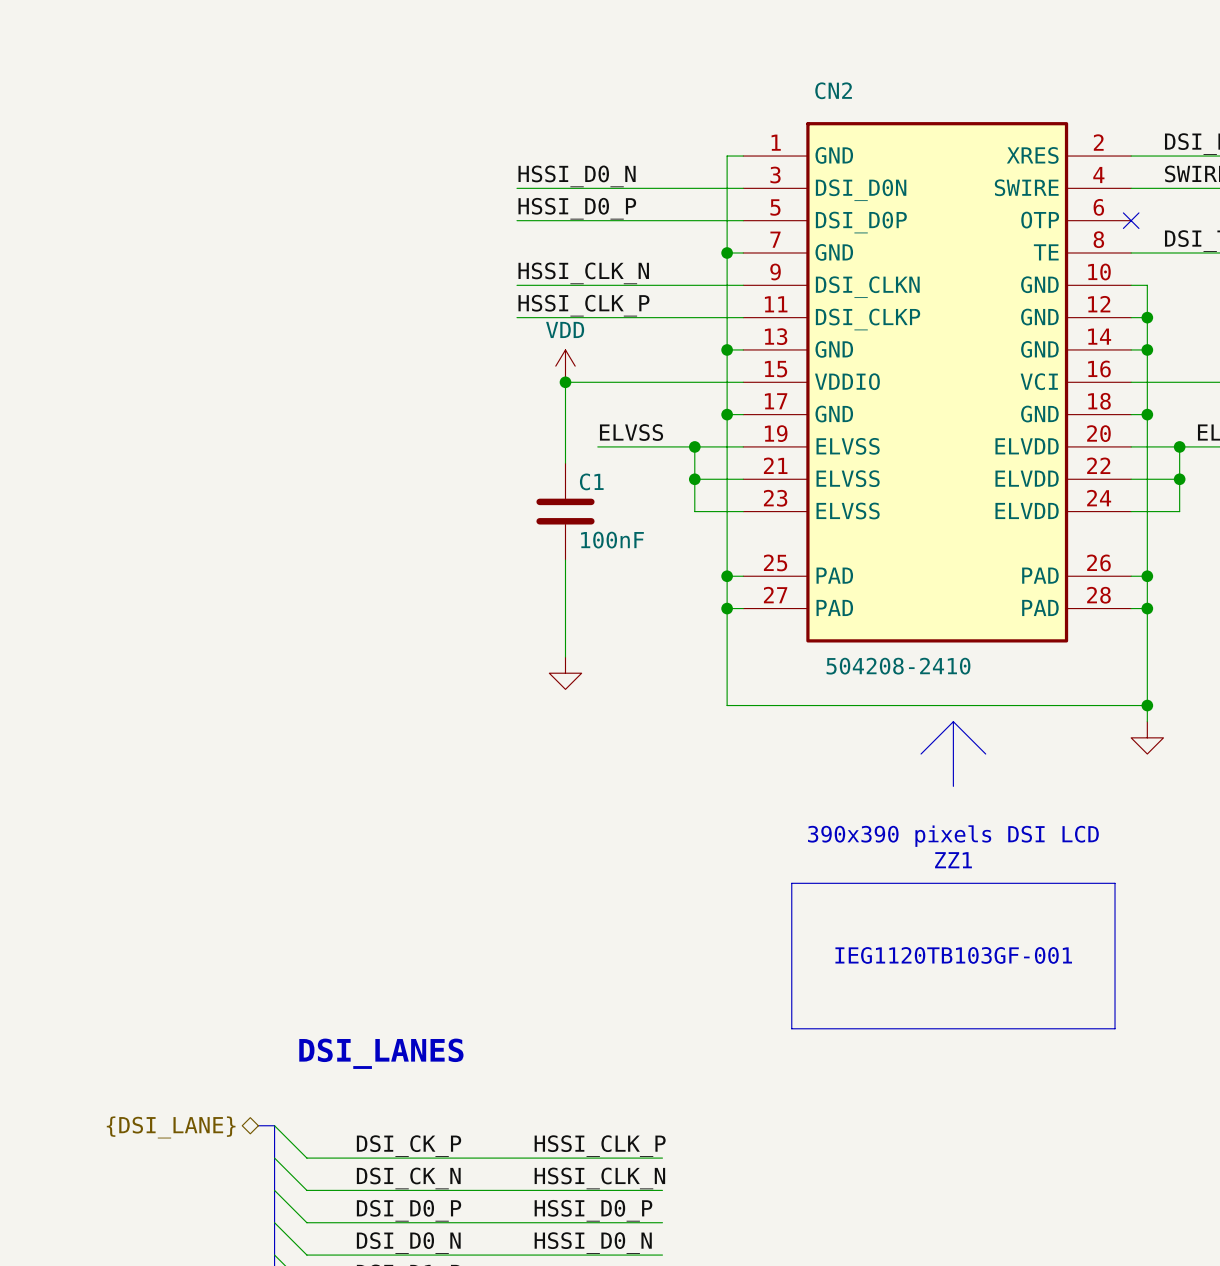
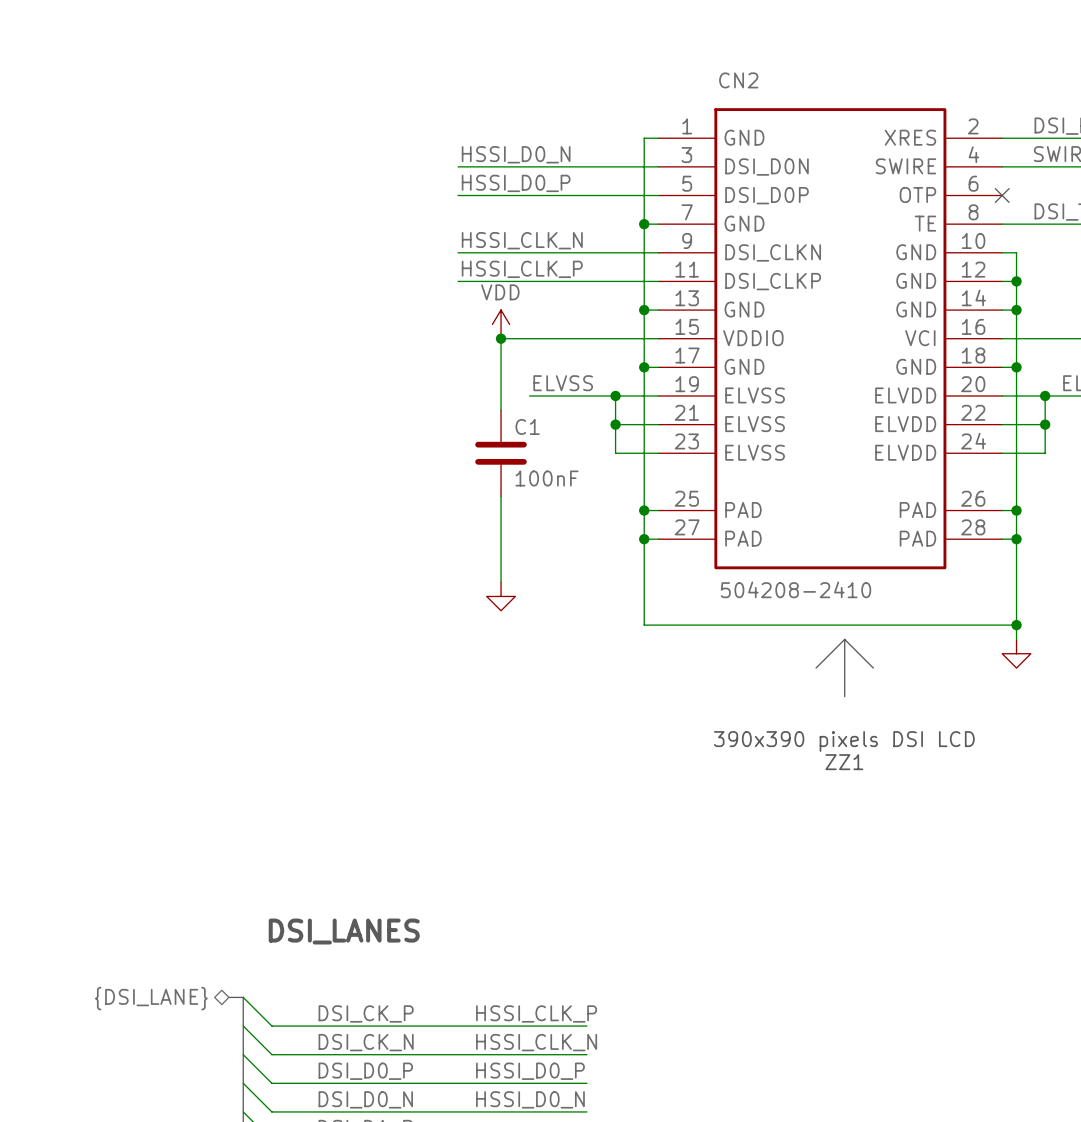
line: (791, 883) (1115, 883) (1115, 1028) (791, 1028) (791, 883) -> none
text: IEG1120TB103GF-001 (953, 955) -> none

